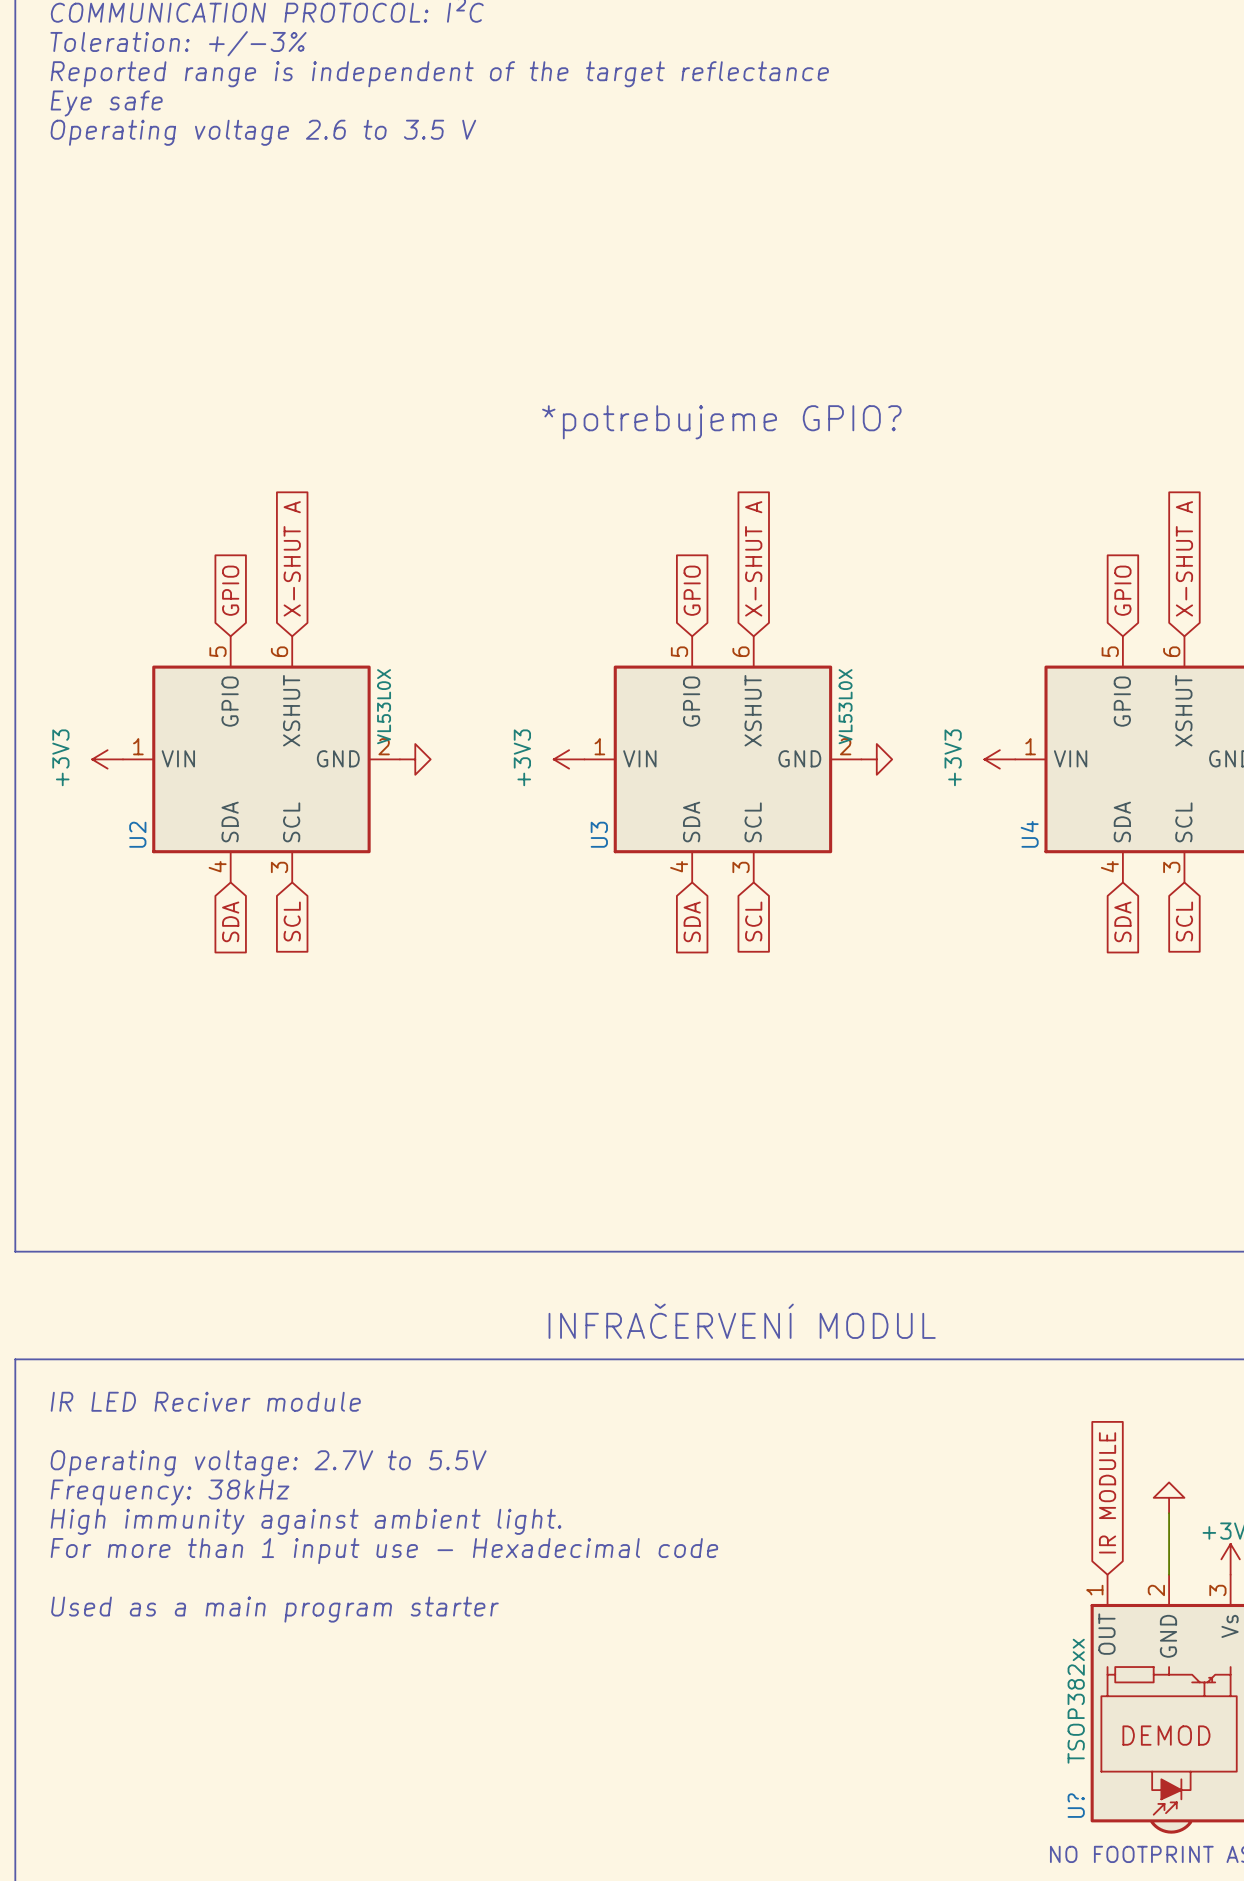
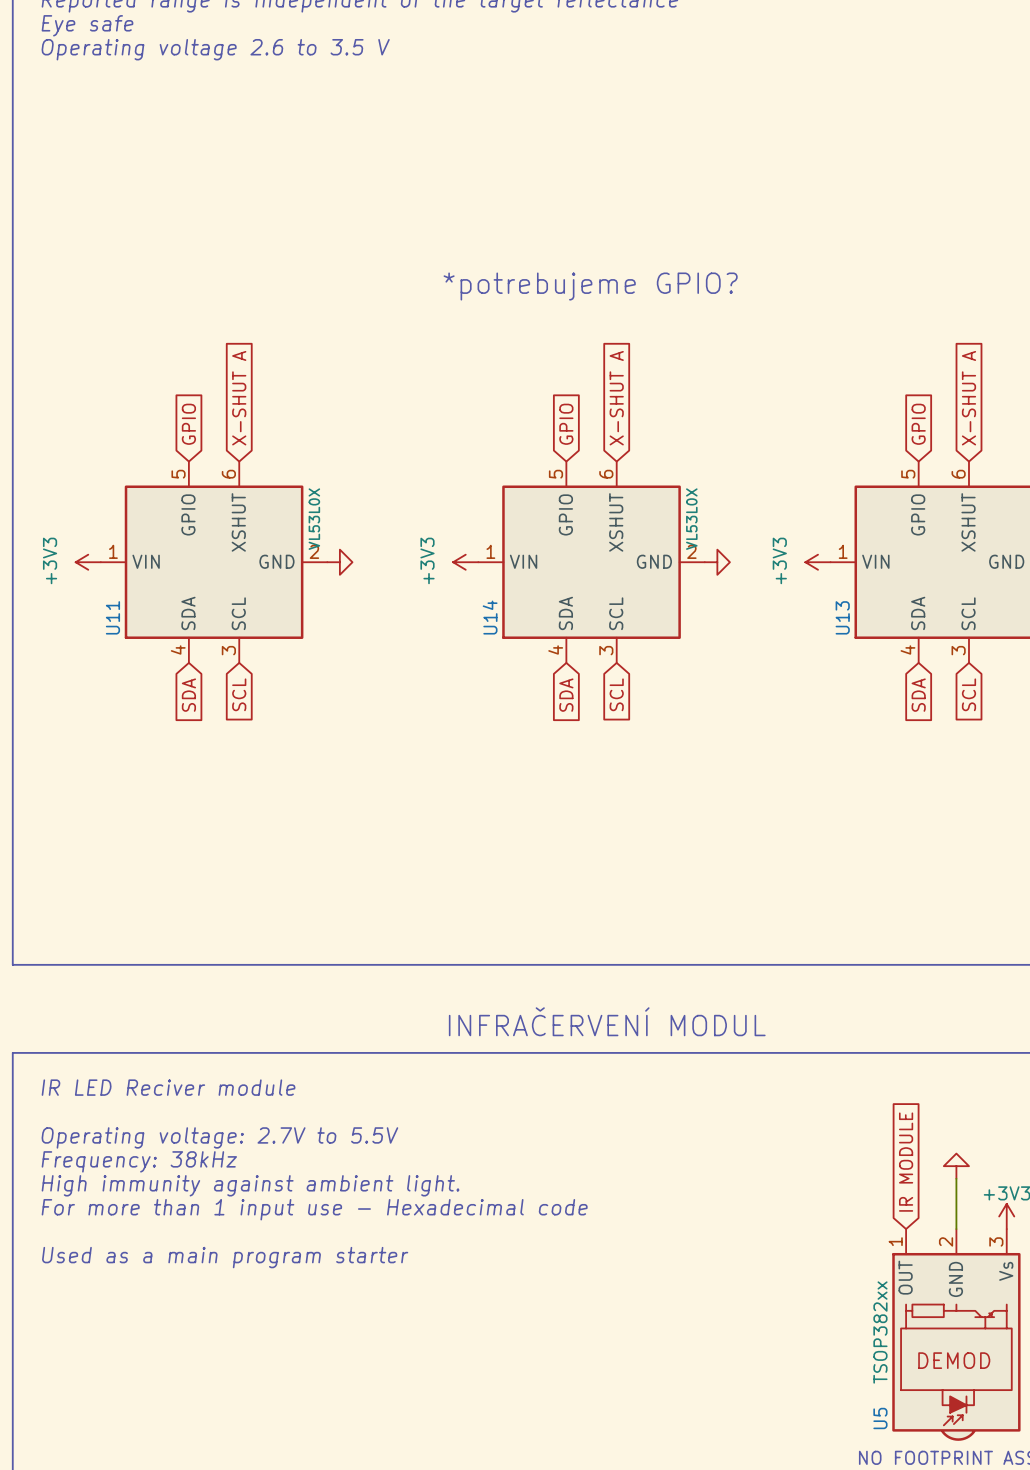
U2 name: U2 (137, 834) -> U11 (112, 617)
U3 name: U3 (599, 834) -> U14 (490, 617)
U4 name: U4 (1029, 834) -> U13 (842, 617)
U? name: U? (1076, 1805) -> U5 (880, 1418)

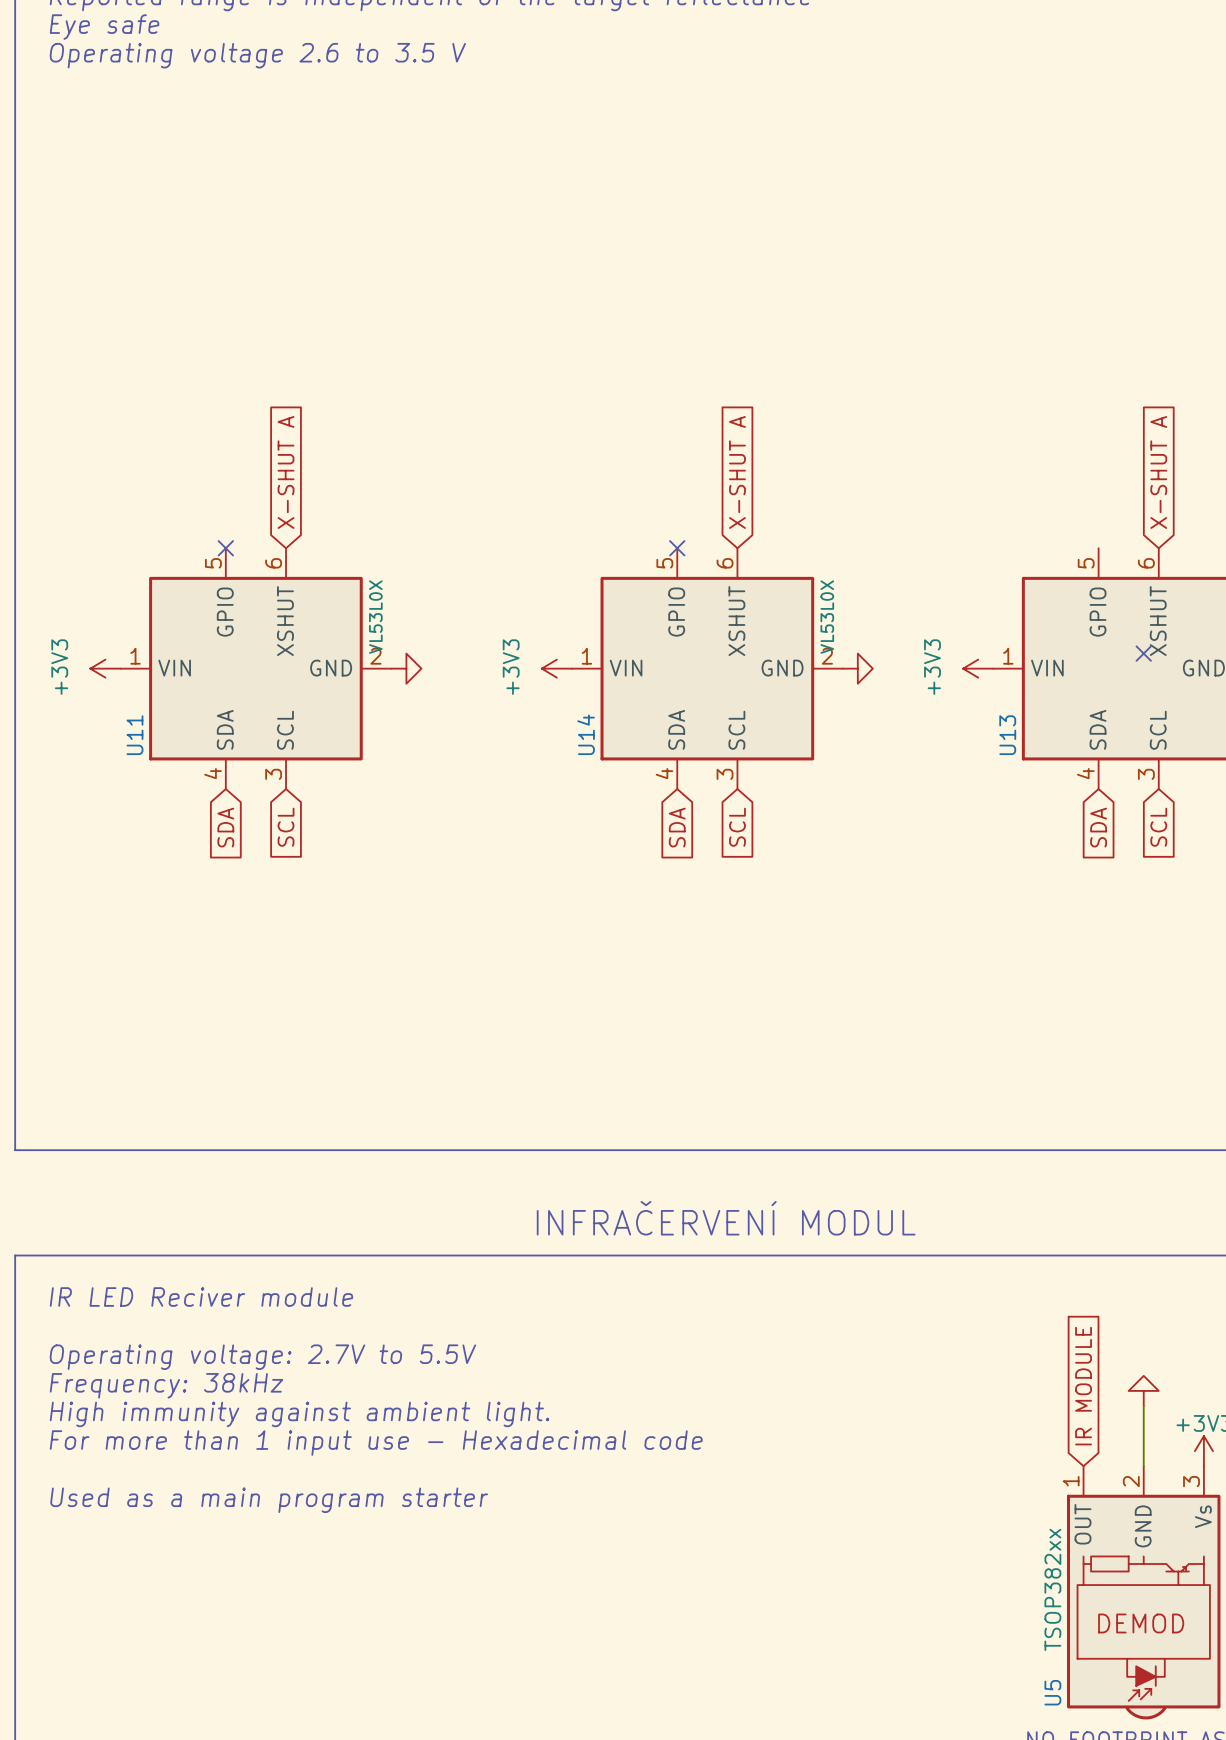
text: *potrebujeme GPIO? (590, 286) -> none
global label: GPIO (188, 424) -> none
global label: GPIO (566, 424) -> none
global label: GPIO (918, 424) -> none
no-connect mark: none -> (225, 548)
no-connect mark: none -> (677, 548)
no-connect mark: none -> (1143, 653)

